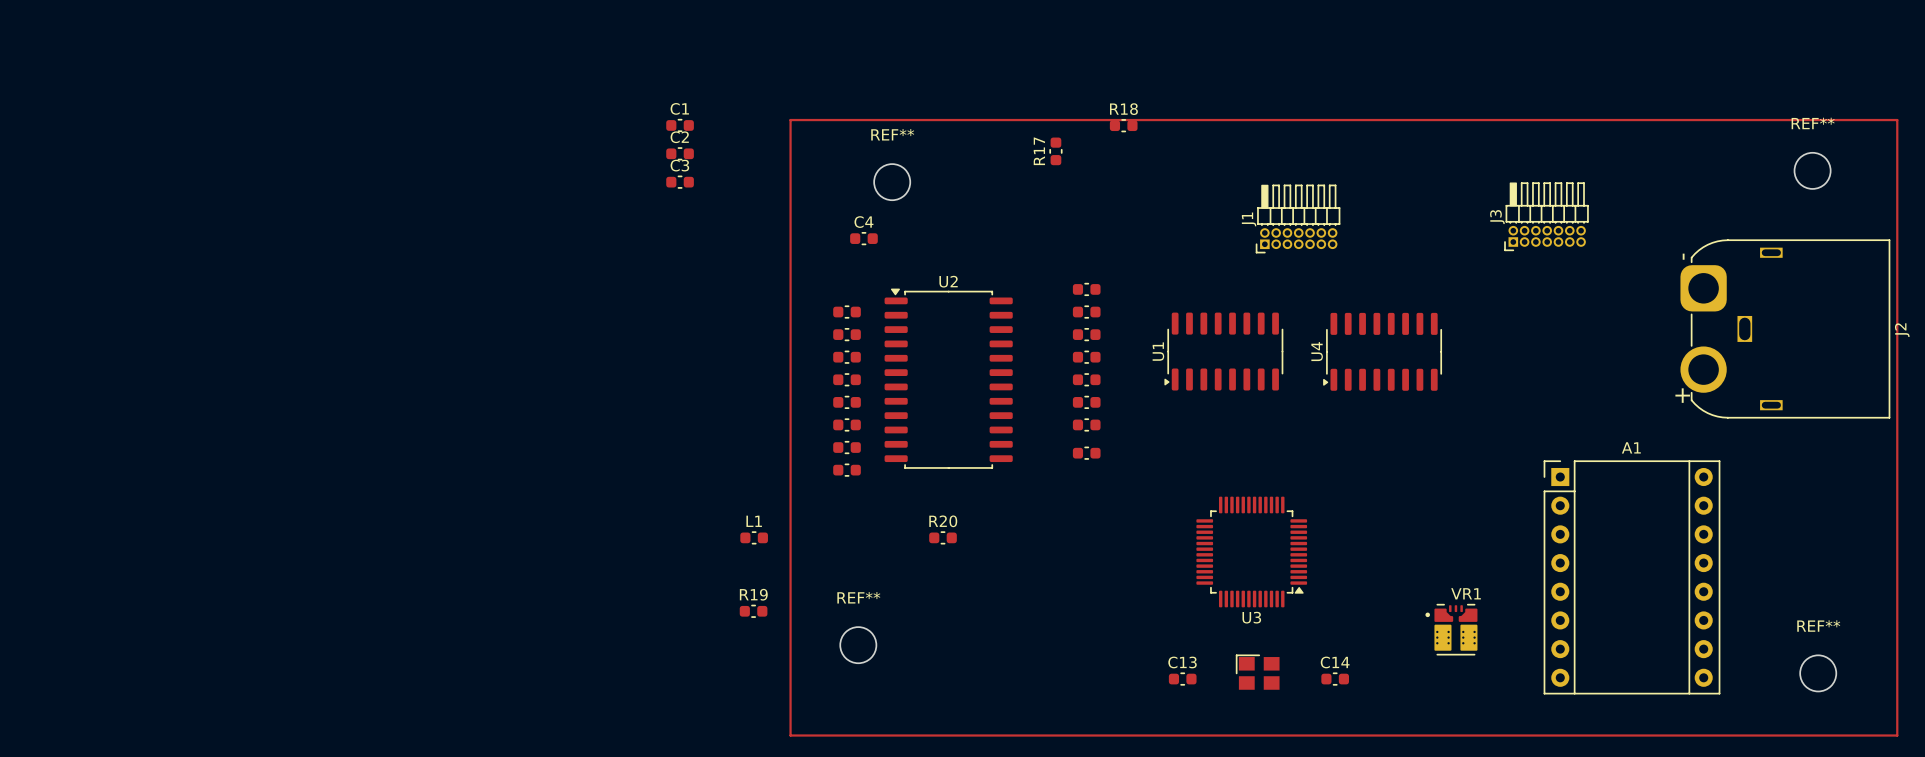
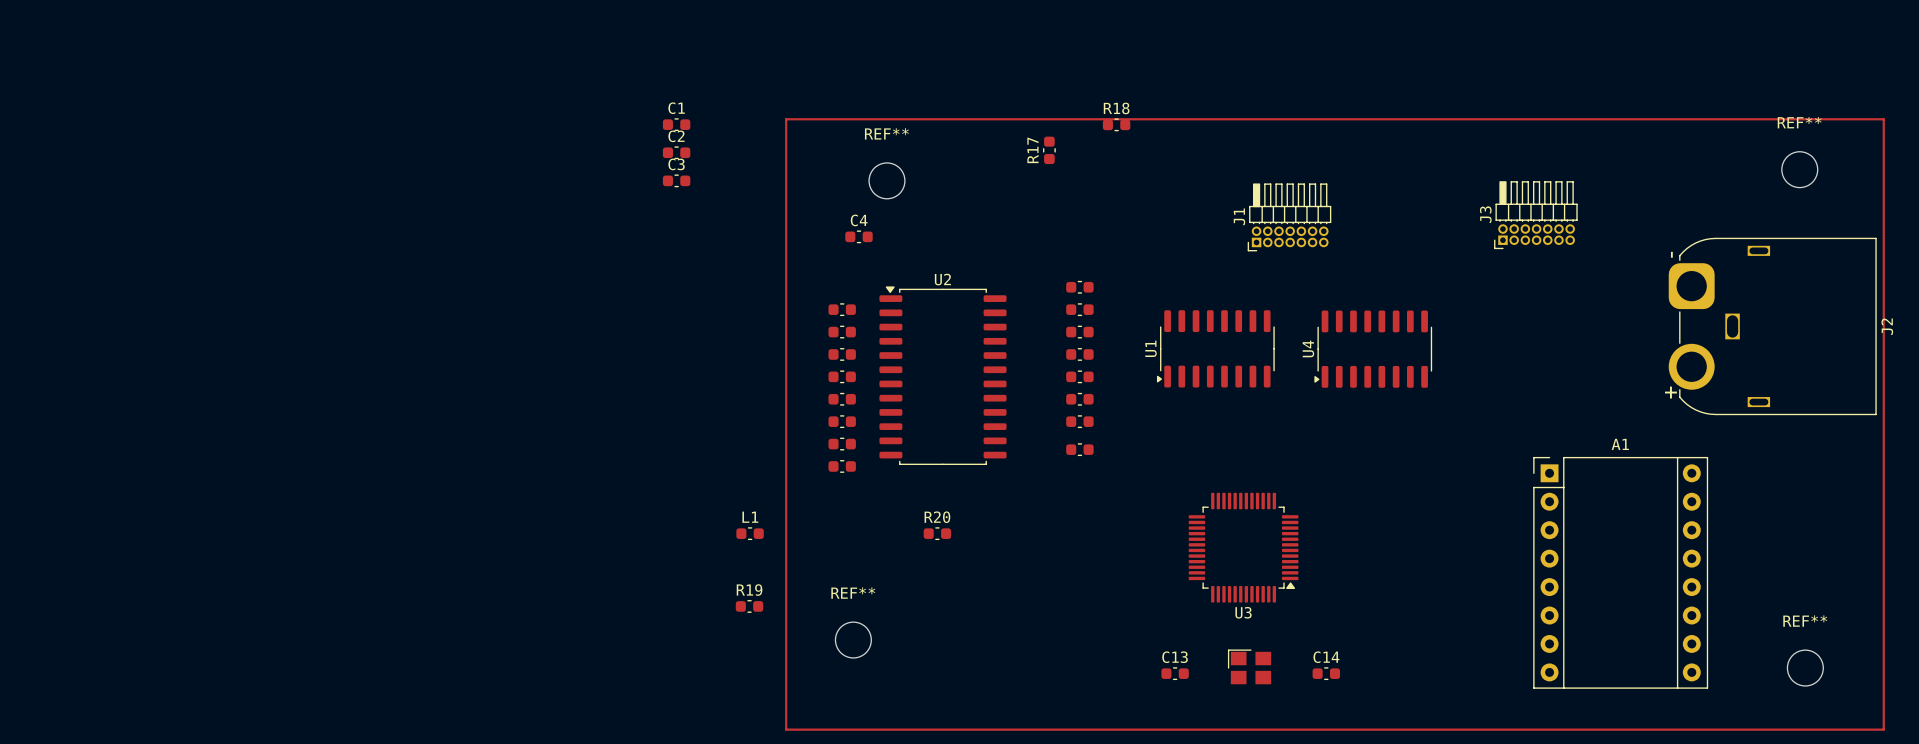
VR1: (1451, 629) -> none

